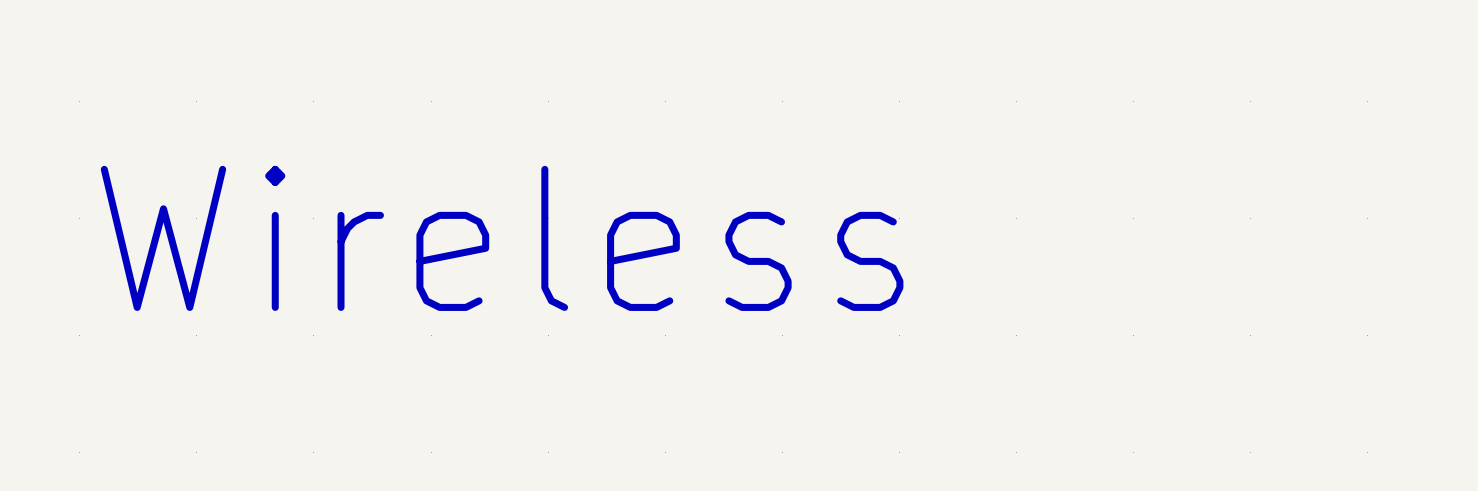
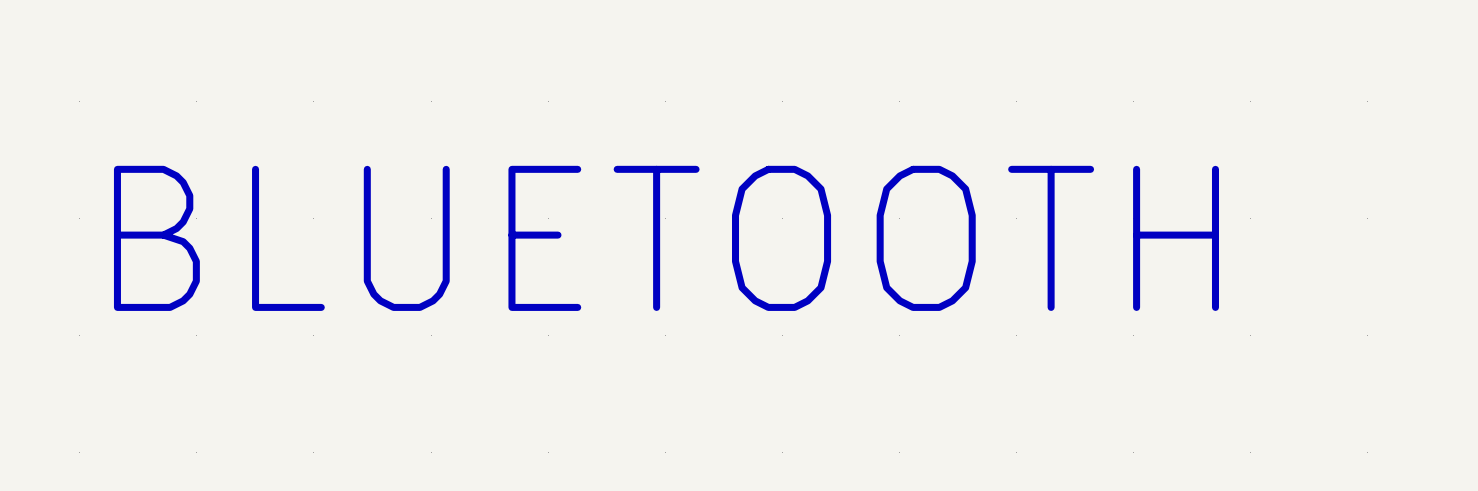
text: Wireless (502, 238) -> BLUETOOTH (666, 238)

